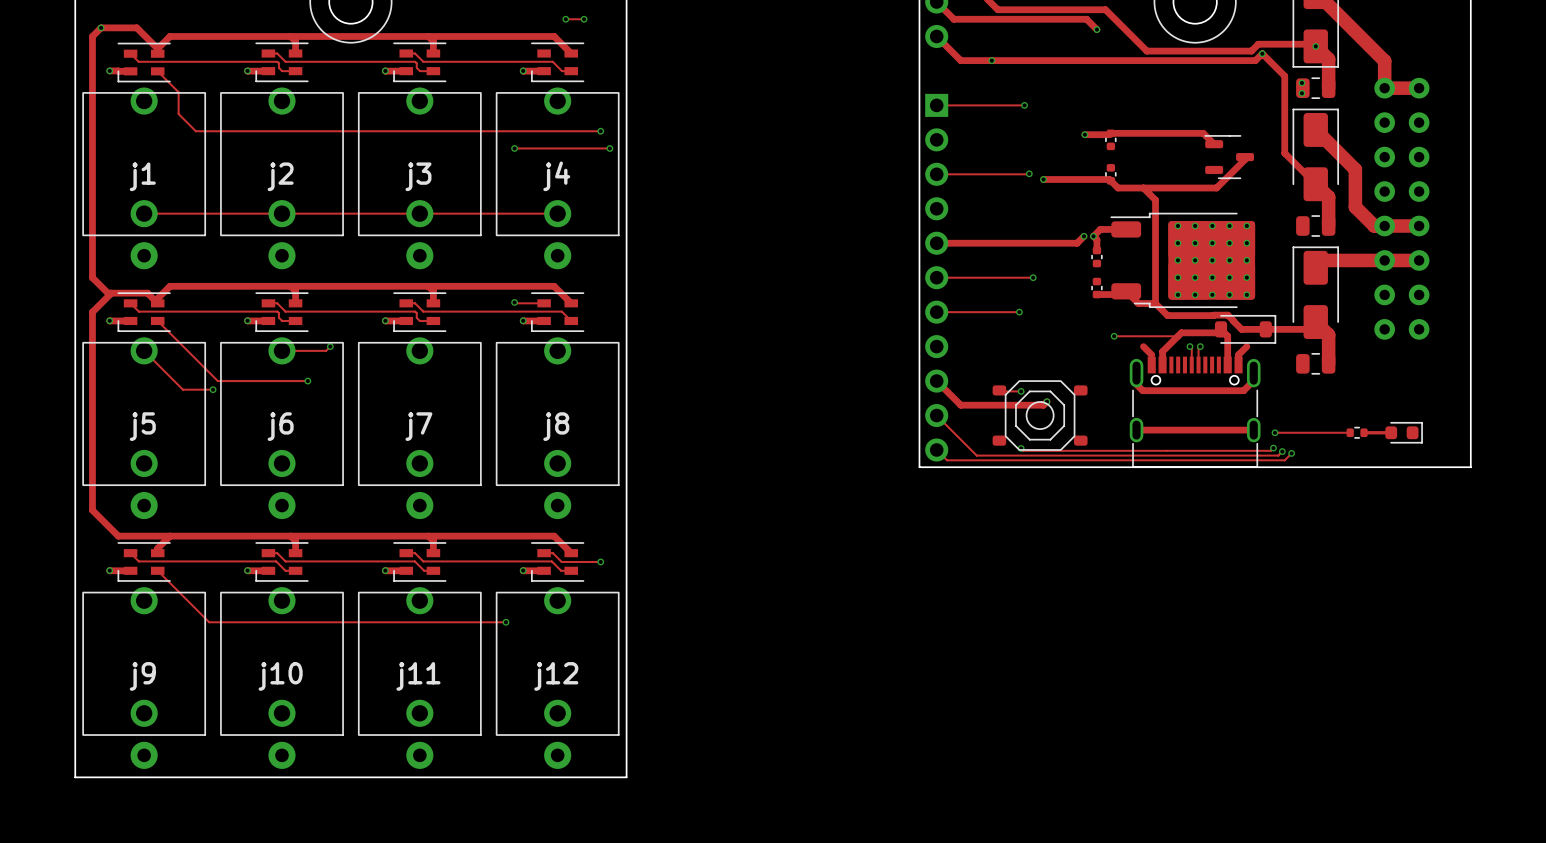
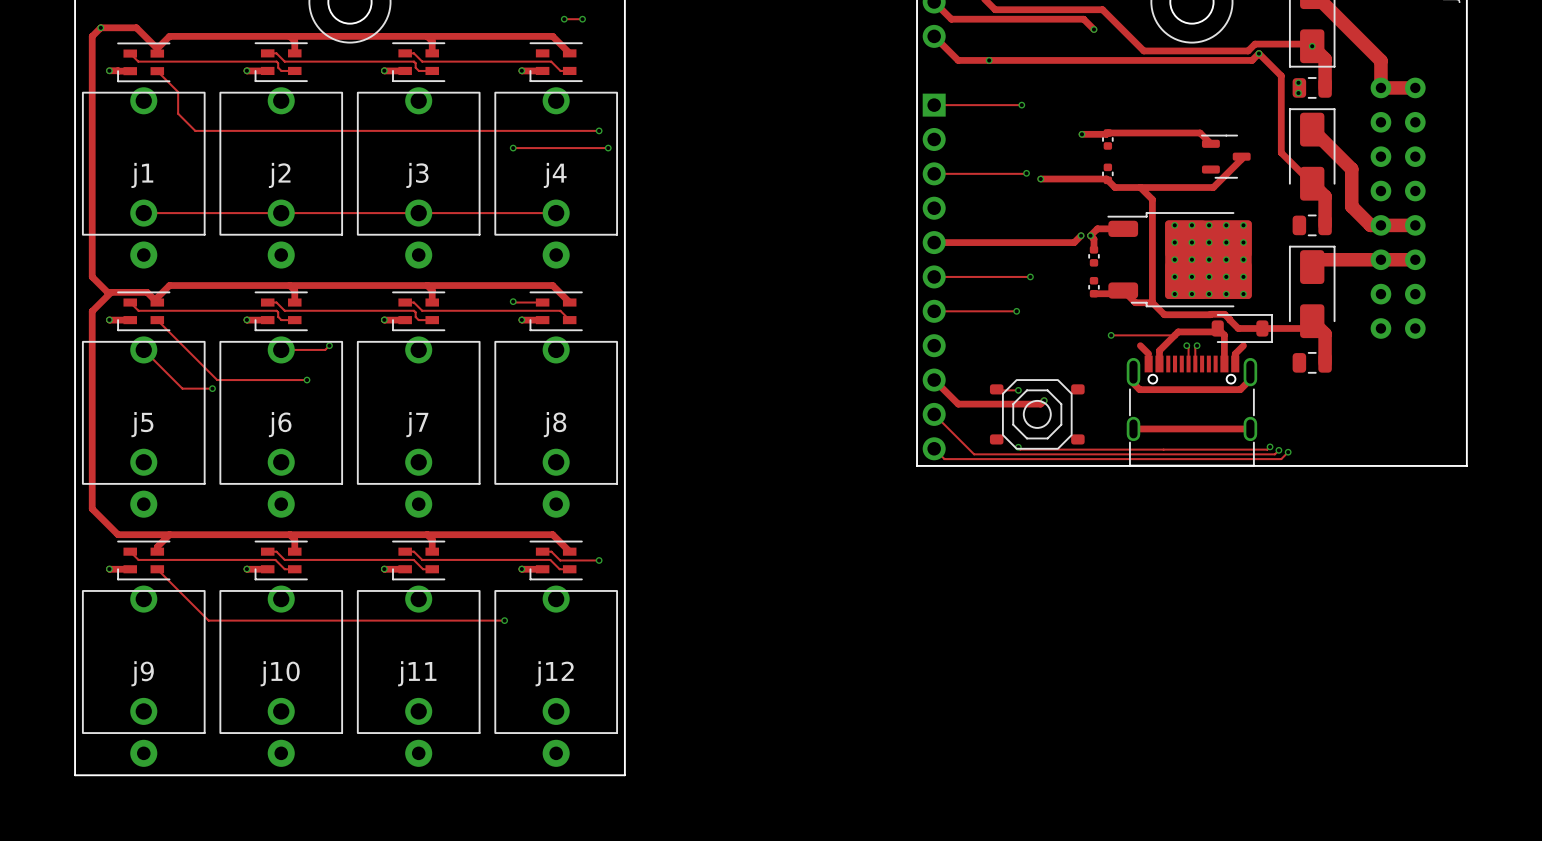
track: (1275, 432) (1350, 432) -> none
via: (1275, 432) -> none
part: (1357, 432) -> none
track: (1364, 432) (1391, 432) -> none
part: (1404, 432) -> none

